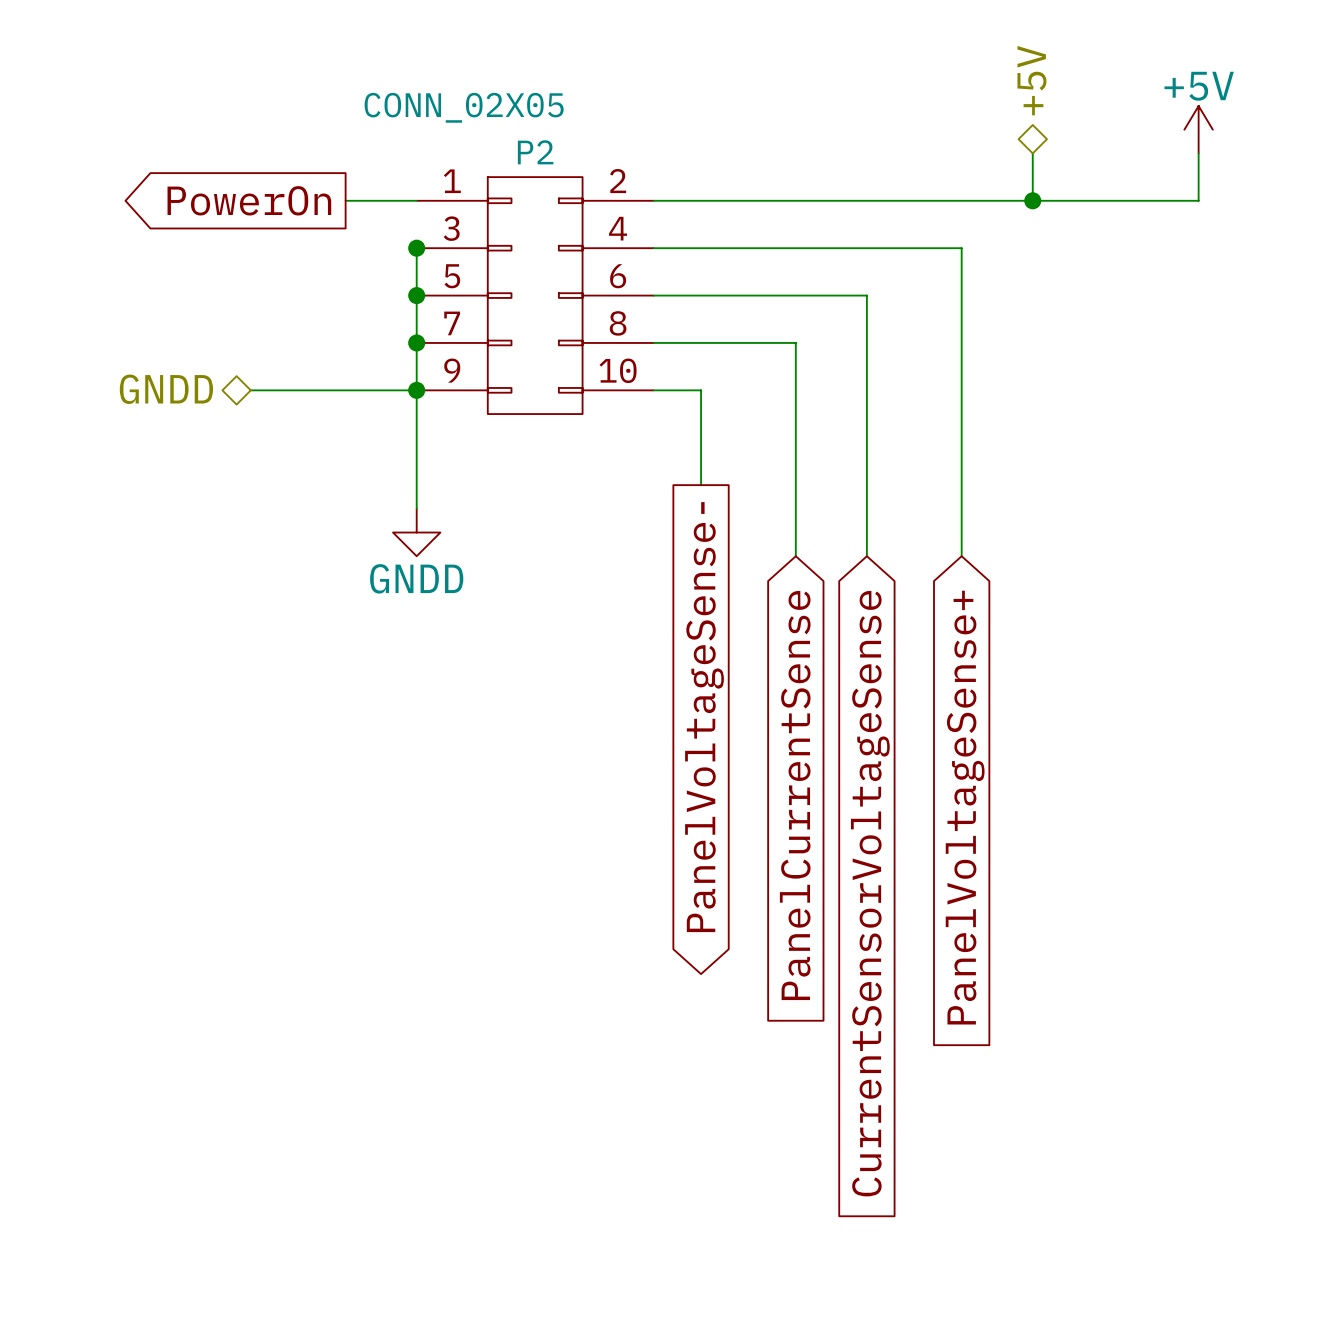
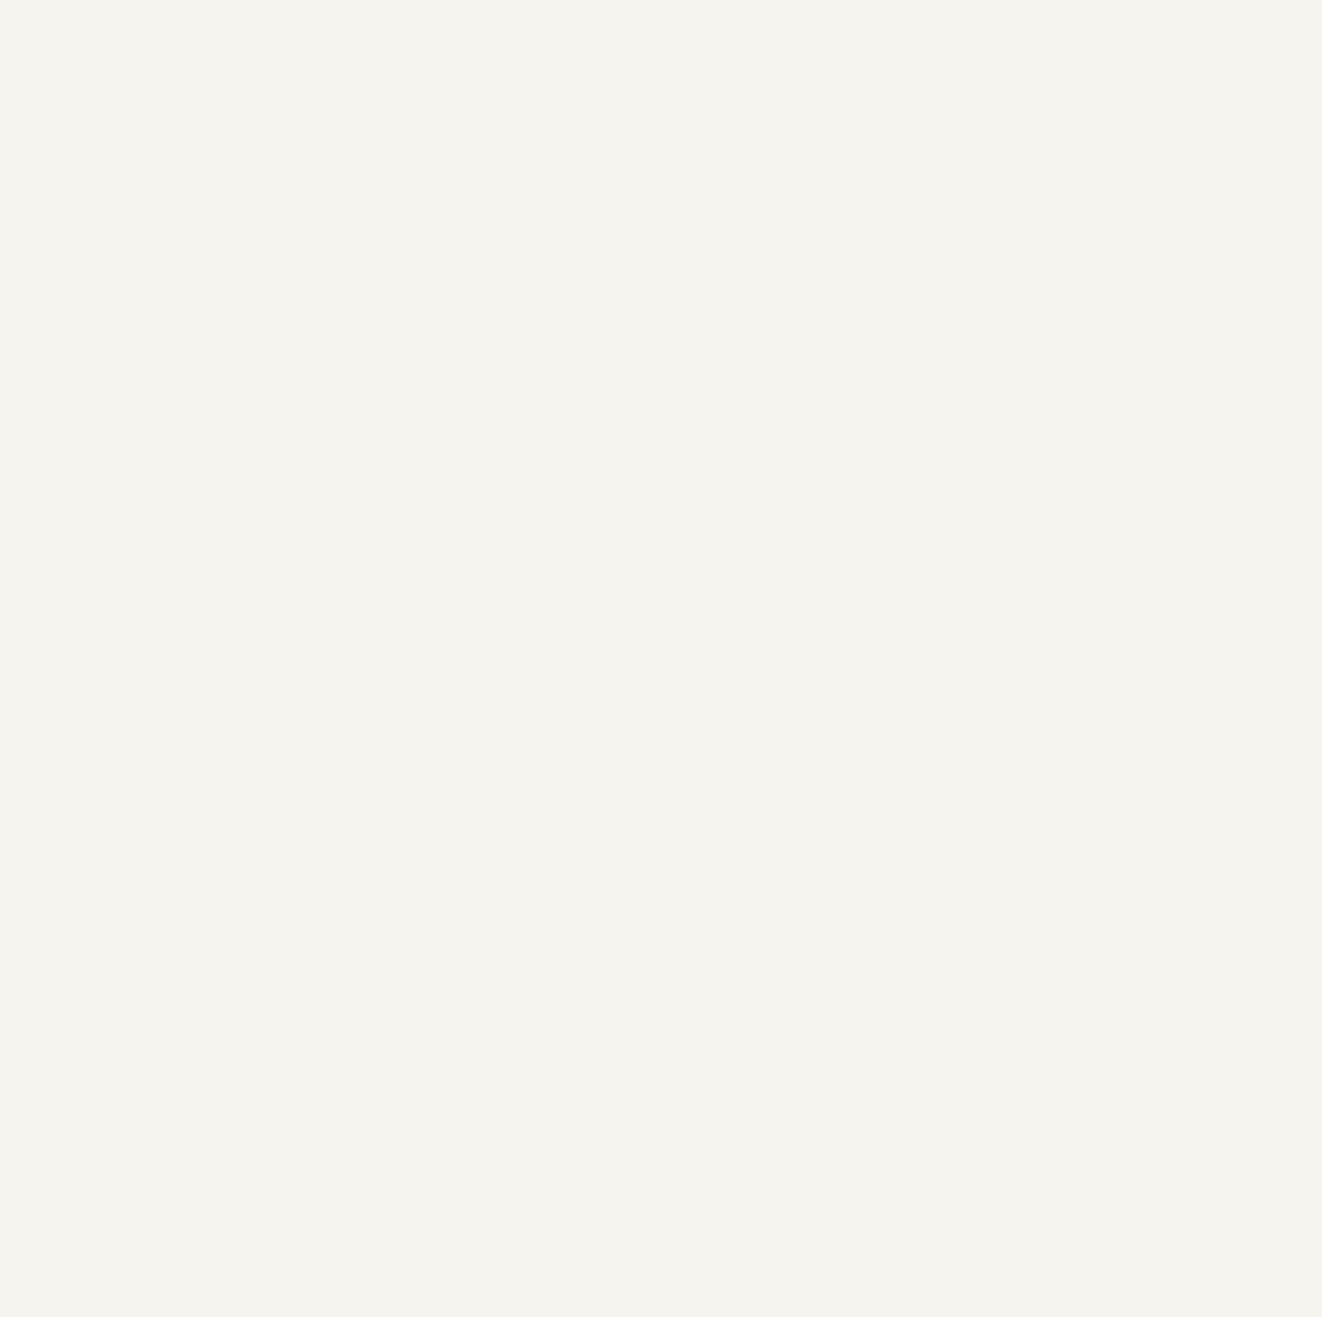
hierarchical label: +5V (1031, 80) -> none
power symbol: +5V (1198, 129) -> none
wire: (1032, 153) (1032, 200) -> none
wire: (1198, 153) (1198, 200) (653, 200) -> none
global label: PowerOn (249, 200) -> none
wire: (345, 200) (416, 200) -> none
junction: (1032, 200) -> none
wire: (416, 248) (416, 508) -> none
junction: (416, 248) -> none
wire: (653, 248) (961, 248) (961, 556) -> none
junction: (416, 295) -> none
P2: CONN_02X05 (535, 295) -> none
wire: (653, 295) (866, 295) (866, 556) -> none
junction: (416, 342) -> none
wire: (653, 342) (795, 342) (795, 556) -> none
hierarchical label: GNDD (166, 389) -> none
wire: (250, 390) (416, 390) -> none
junction: (416, 390) -> none
wire: (653, 390) (701, 390) (701, 485) -> none
power symbol: GNDD (416, 532) -> none
global label: PanelVoltageSense- (704, 717) -> none
global label: PanelCurrentSense (795, 795) -> none
global label: PanelVoltageSense+ (965, 807) -> none
global label: CurrentSensorVoltageSense (870, 893) -> none

